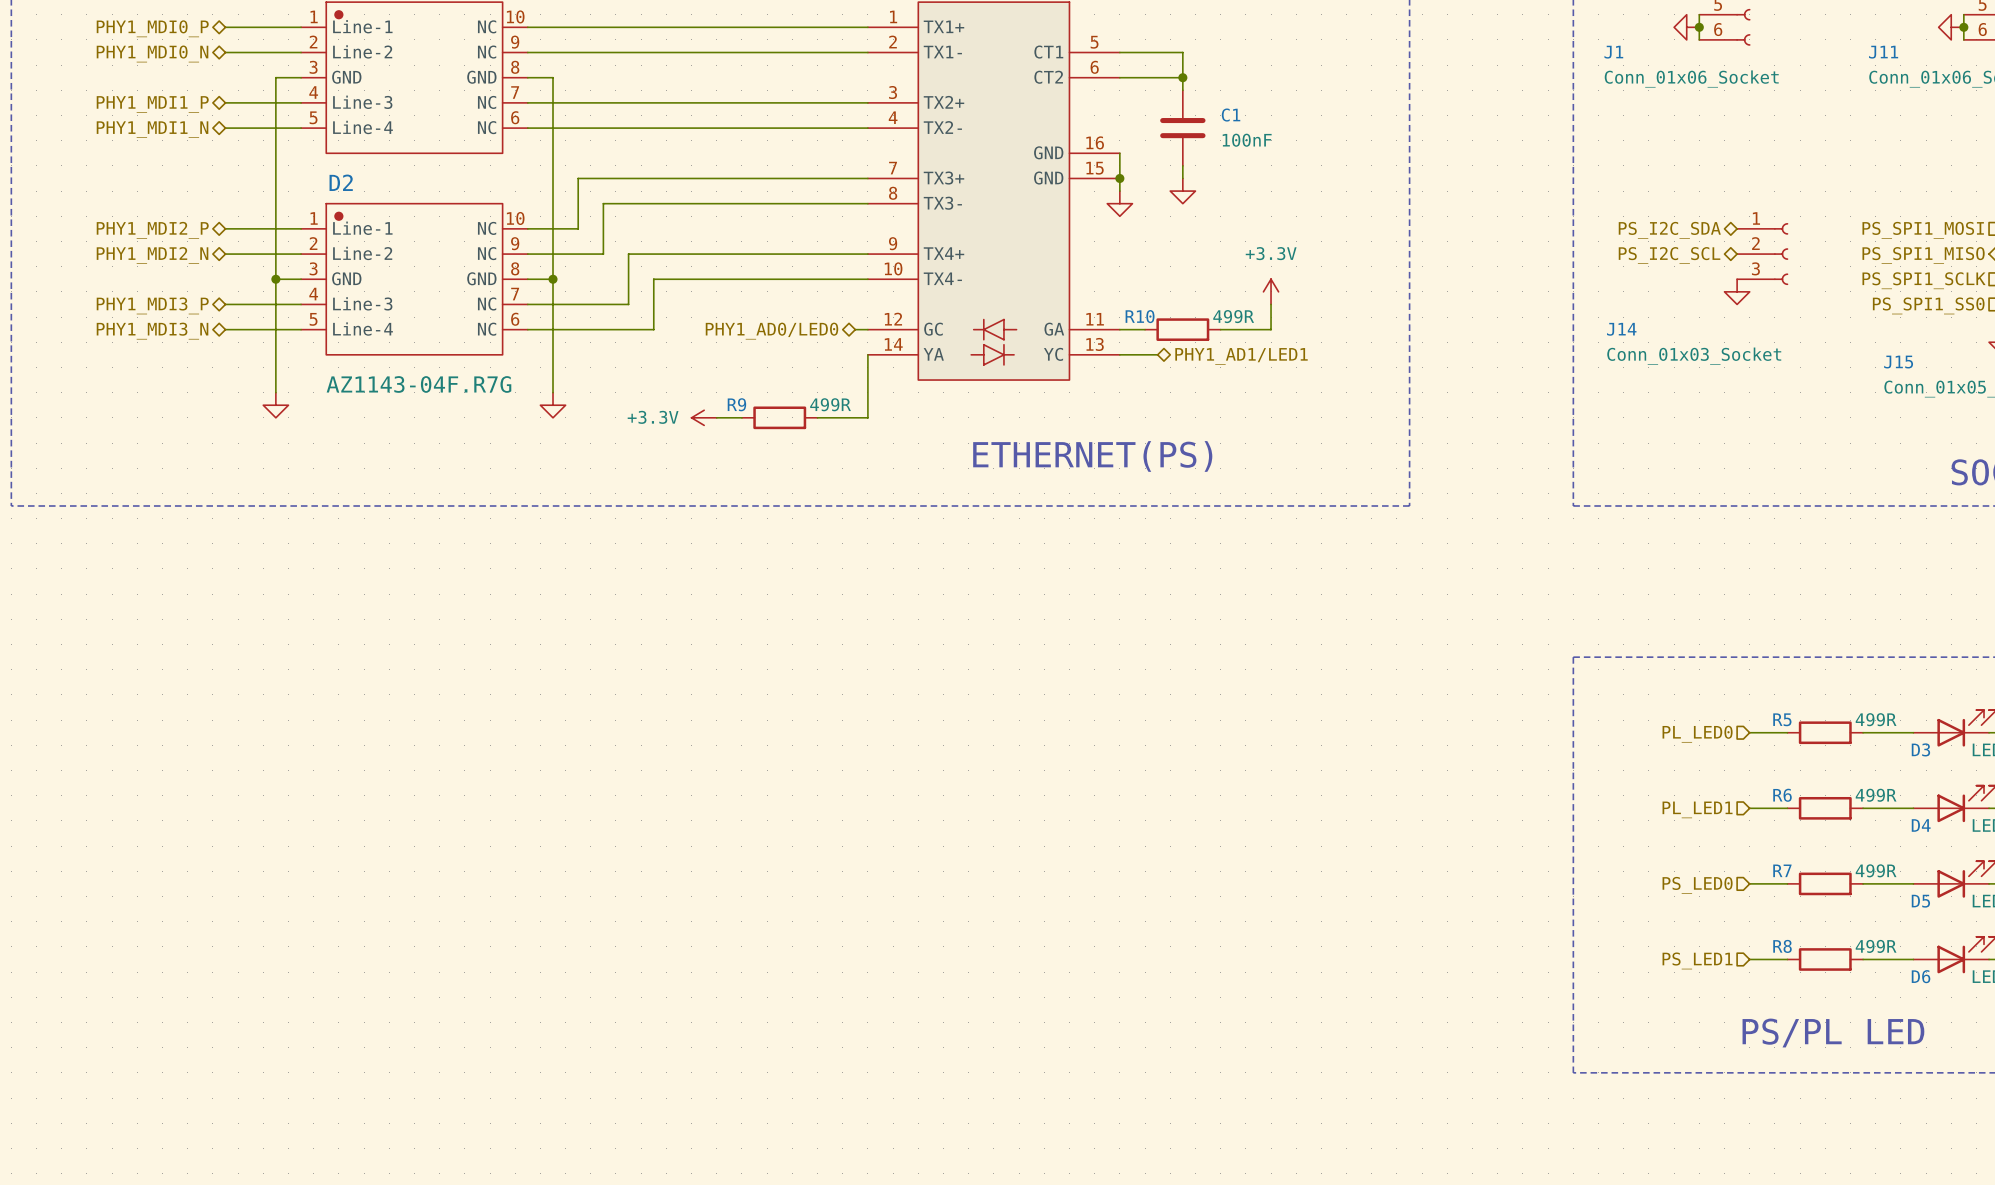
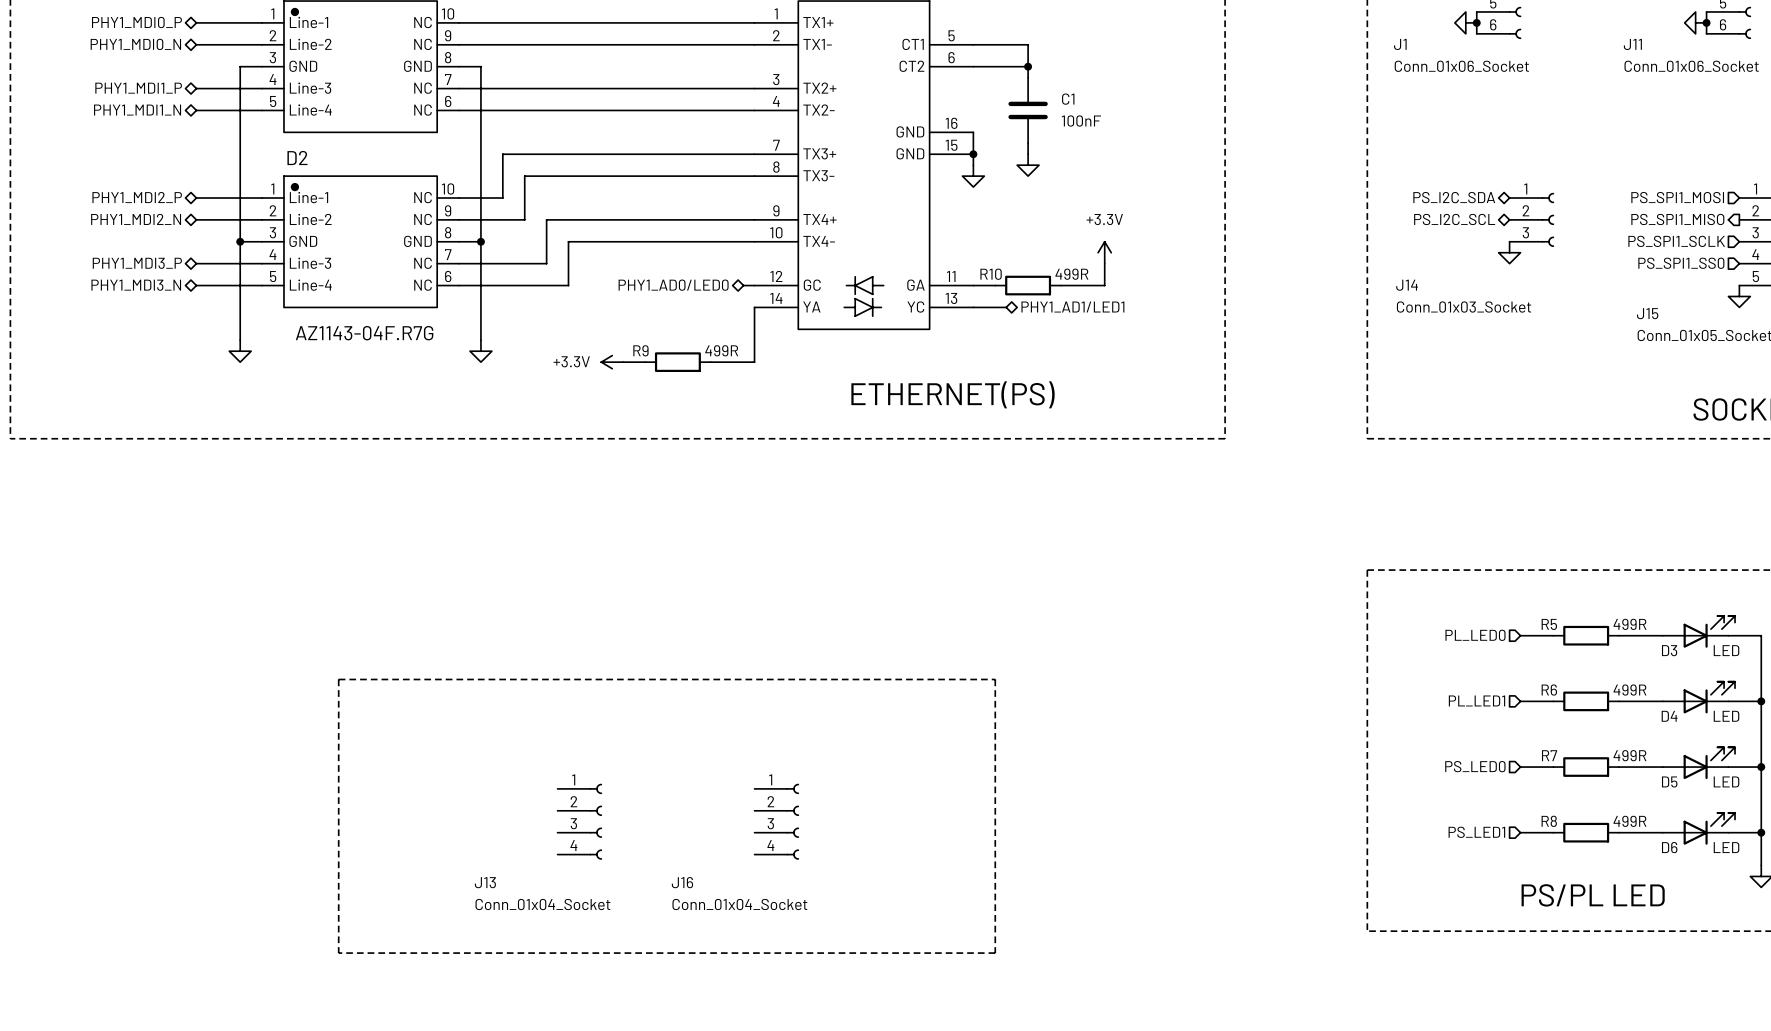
line: none -> (338, 679) (338, 953) (995, 953) (995, 679) (338, 679)
J13: none -> Conn_01x04_Socket (579, 821)
J16: none -> Conn_01x04_Socket (776, 821)

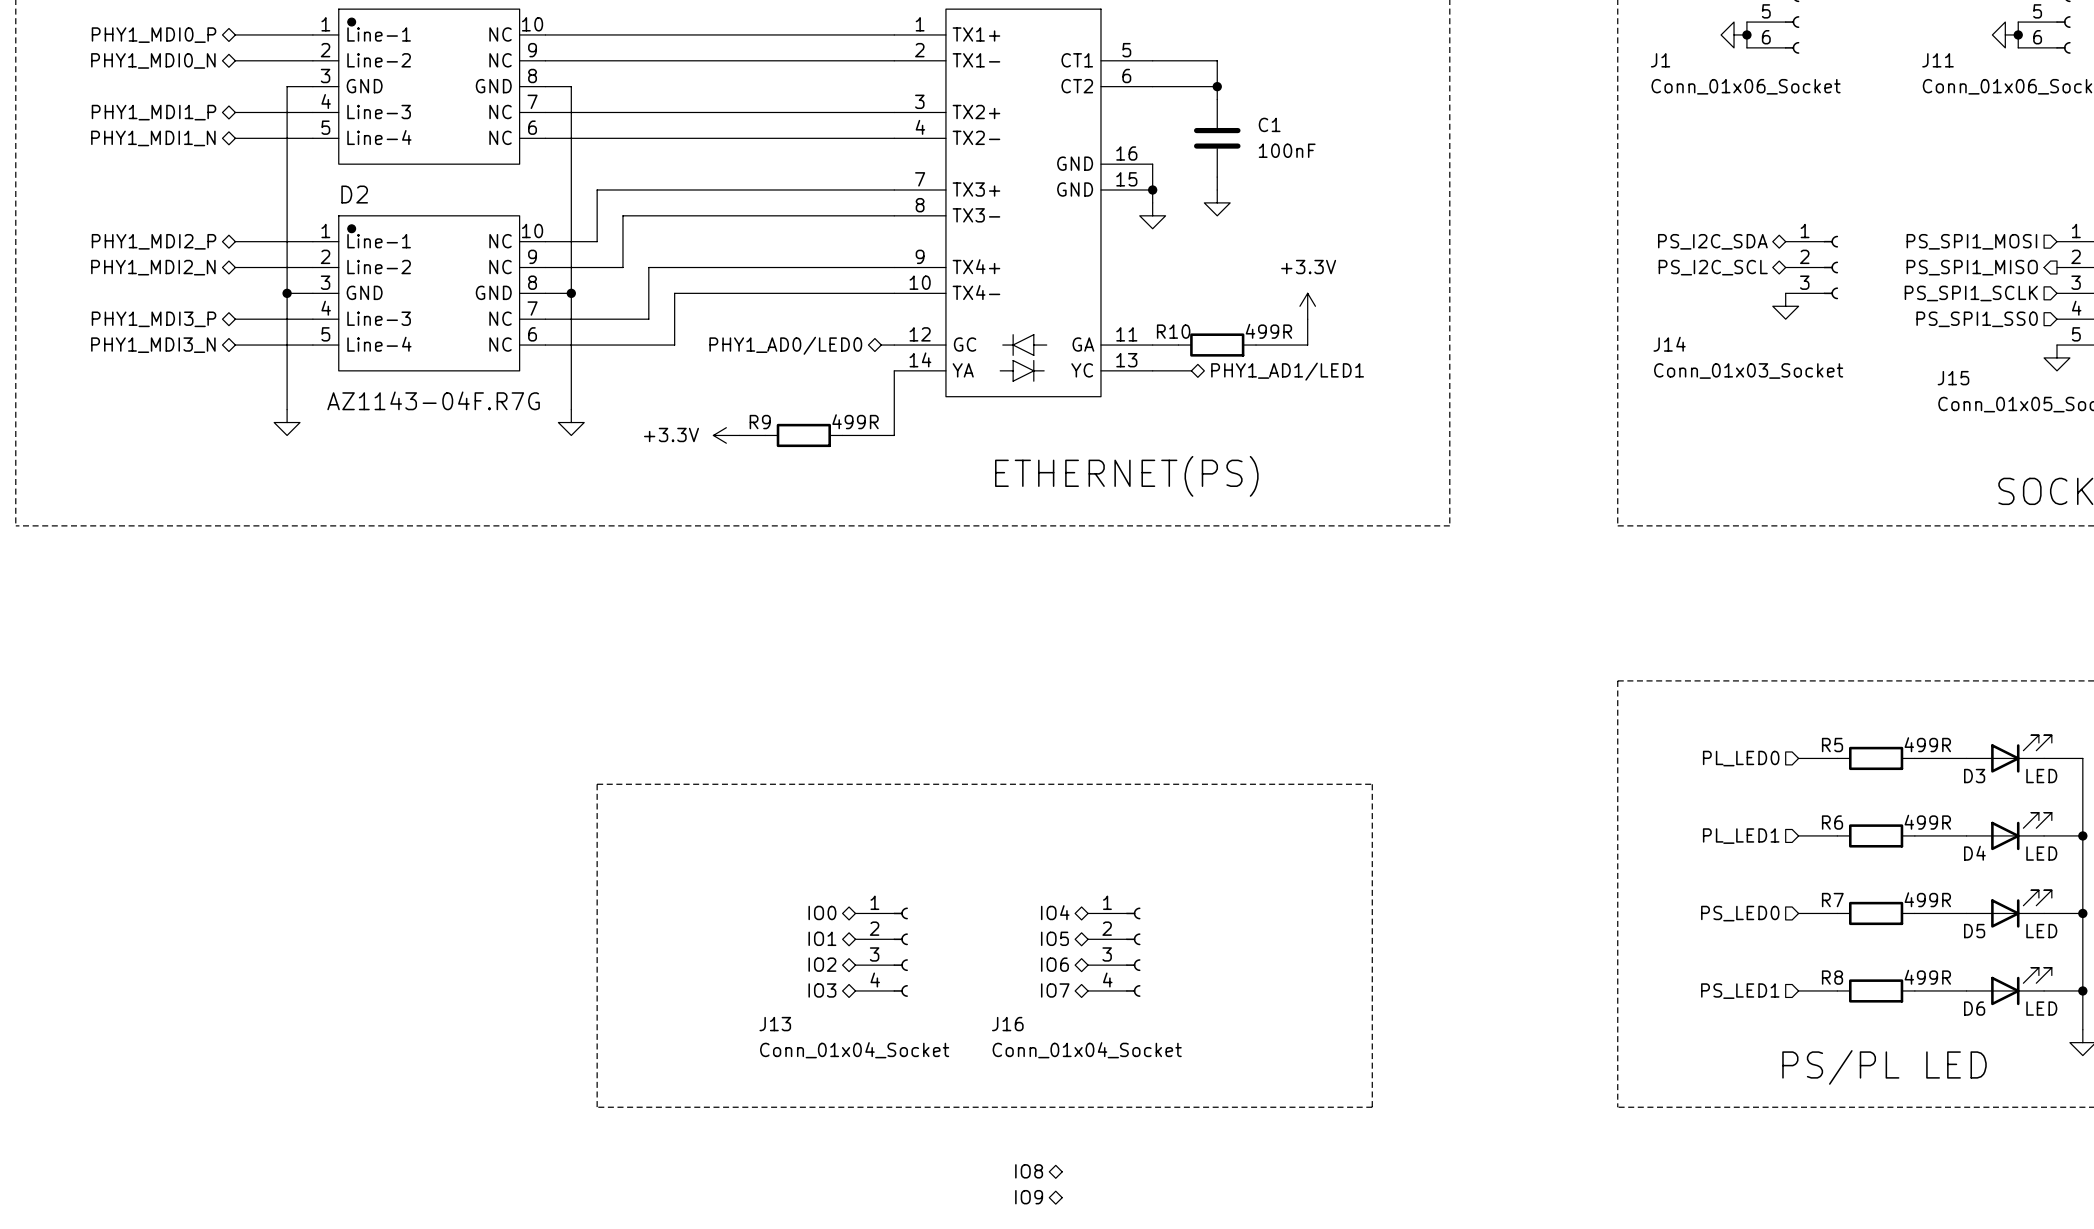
line: (338, 679) (338, 953) (995, 953) (995, 679) (338, 679) -> (597, 784) (597, 1107) (1372, 1107) (1372, 784) (597, 784)
hierarchical label: none -> IO0 (822, 912)
hierarchical label: none -> IO4 (1055, 912)
hierarchical label: none -> IO1 (822, 938)
hierarchical label: none -> IO5 (1054, 938)
hierarchical label: none -> IO2 (822, 964)
hierarchical label: none -> IO6 (1054, 964)
J13 position: (579, 821) -> (881, 952)
J16 position: (776, 821) -> (1114, 952)
hierarchical label: none -> IO3 (822, 990)
hierarchical label: none -> IO7 (1055, 990)
hierarchical label: none -> IO8 (1029, 1171)
hierarchical label: none -> IO9 (1029, 1197)

